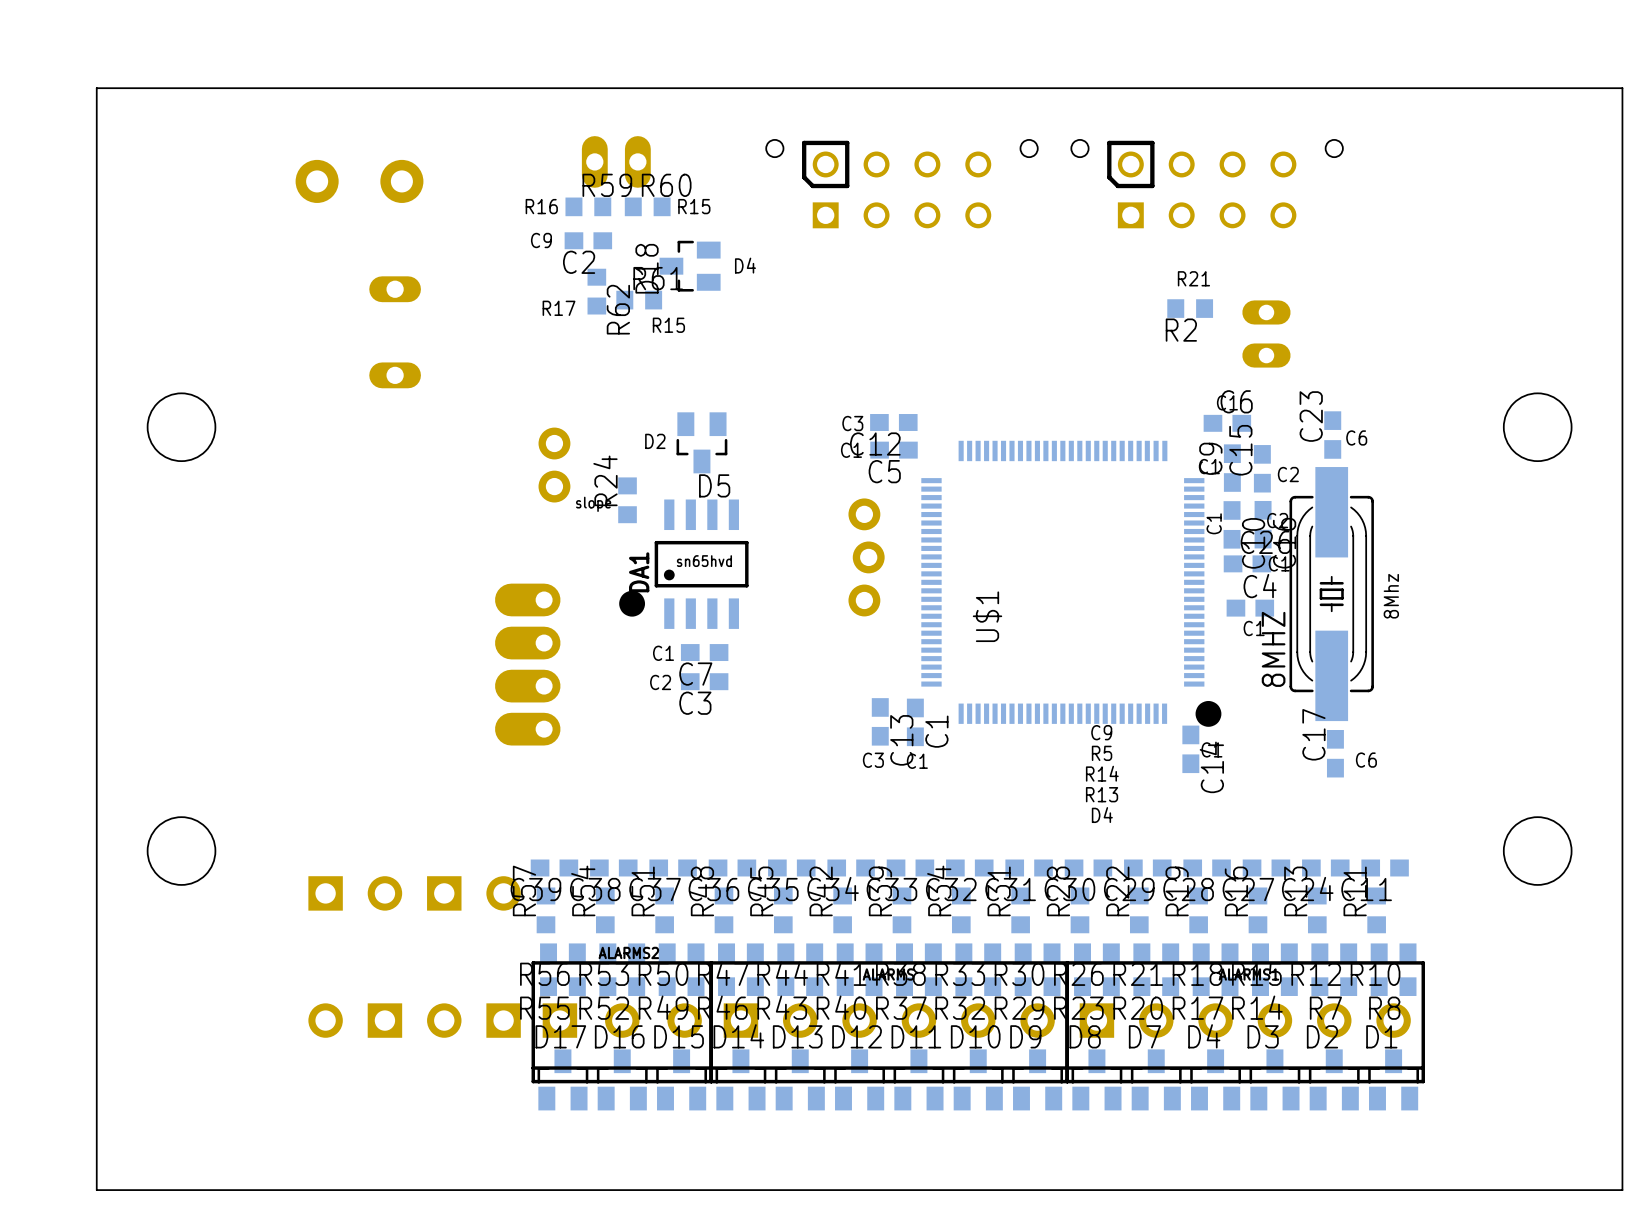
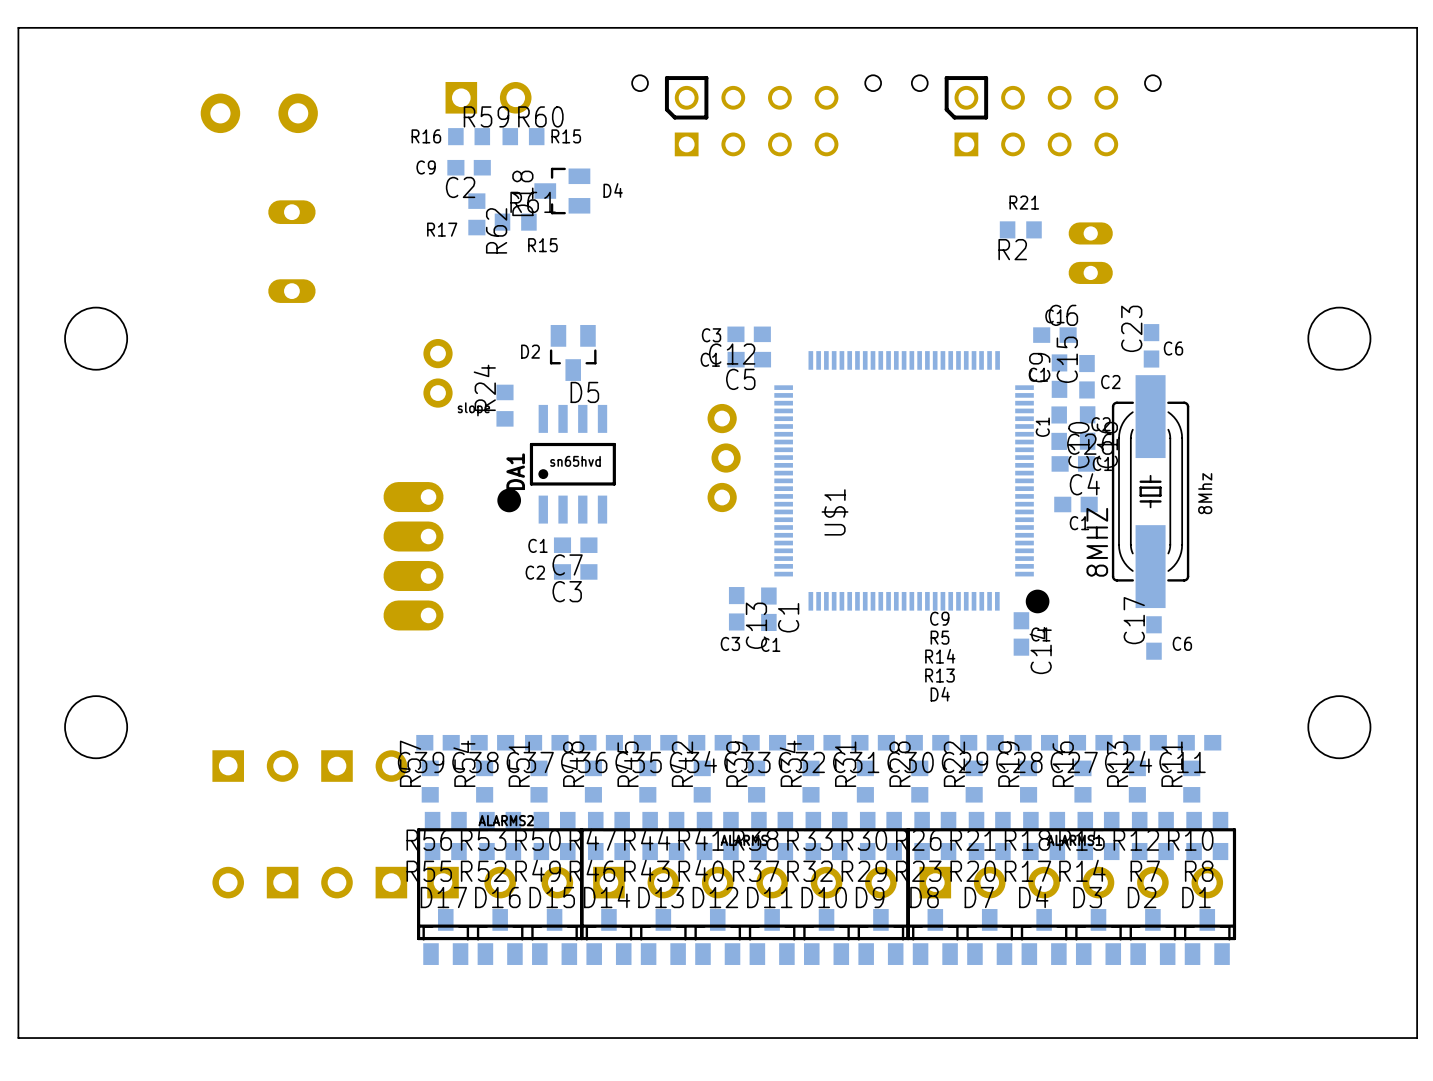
part footprint: [581, 136, 651, 188] -> [445, 81, 532, 114]

